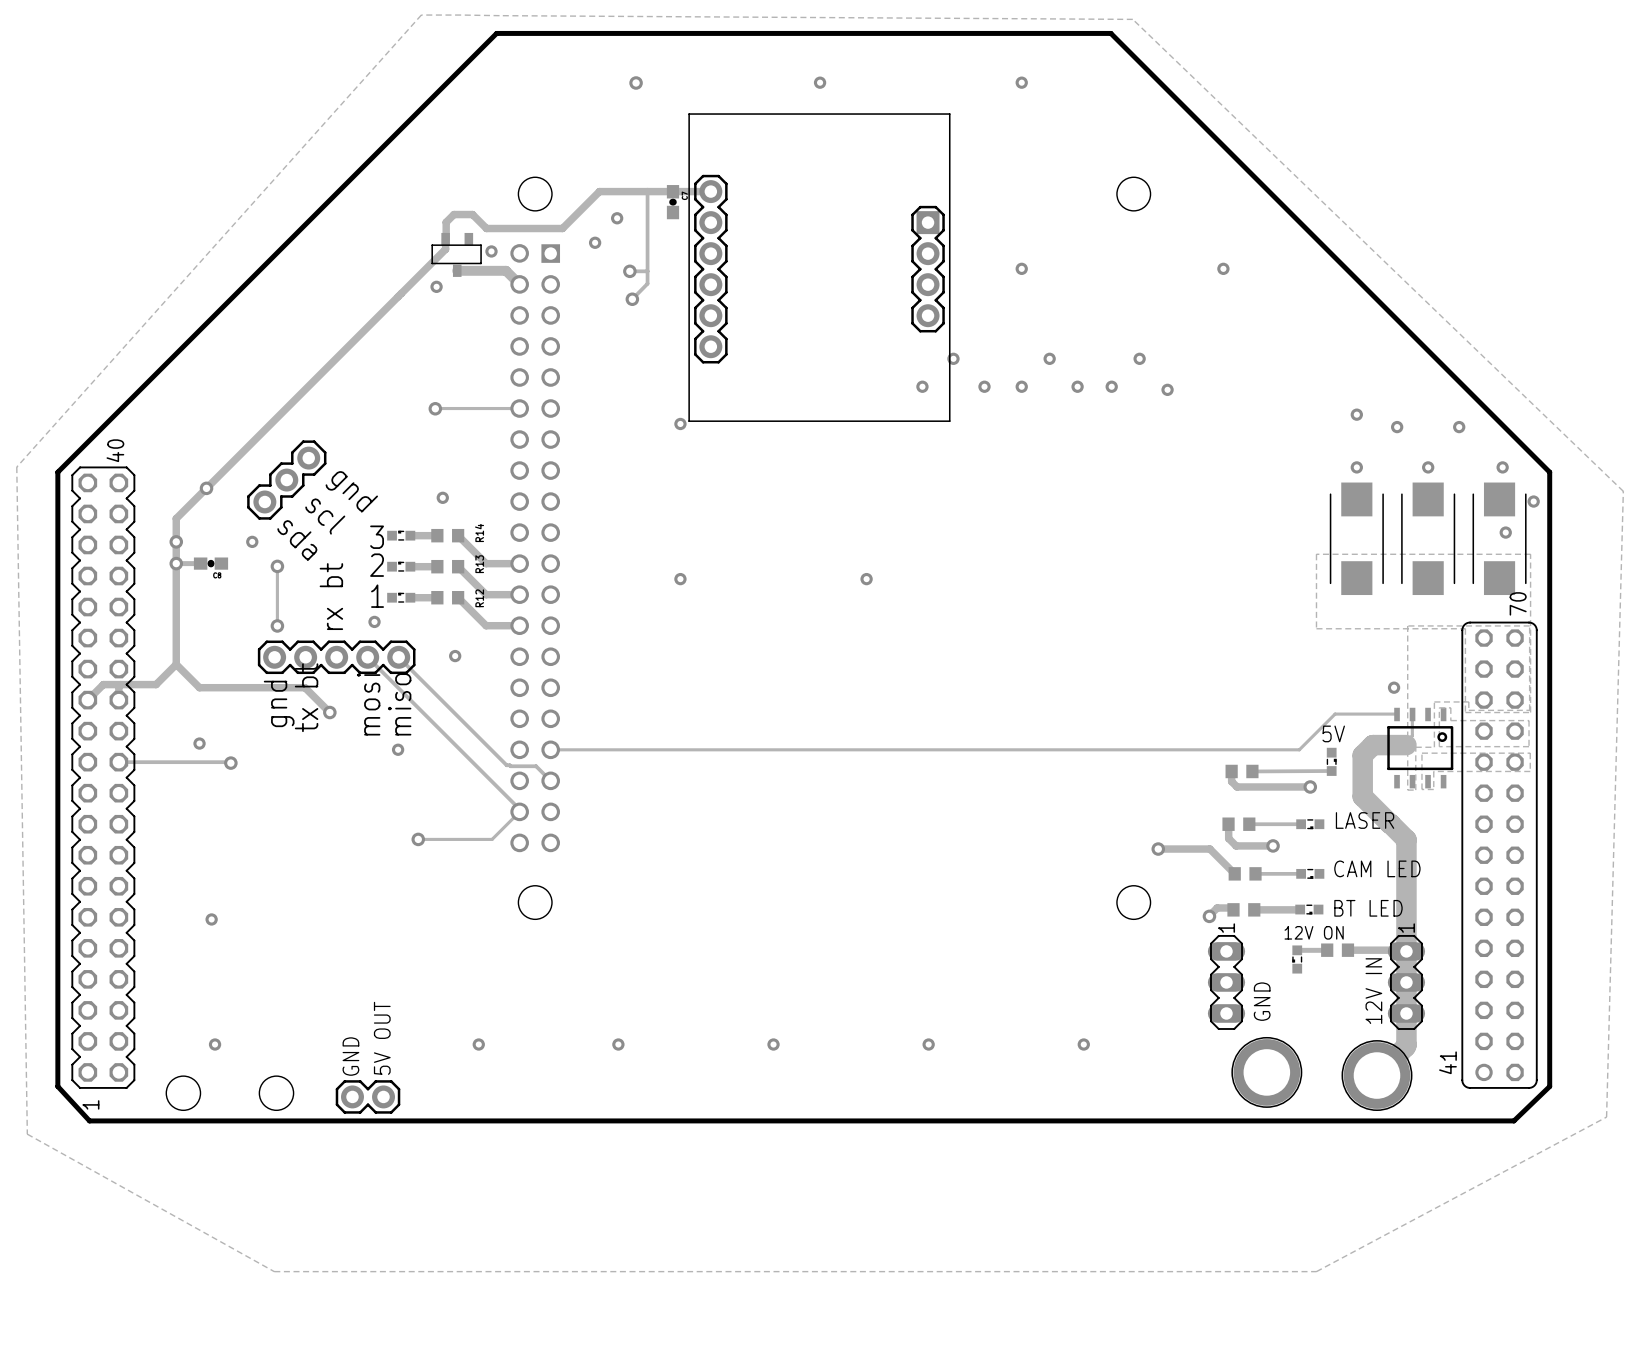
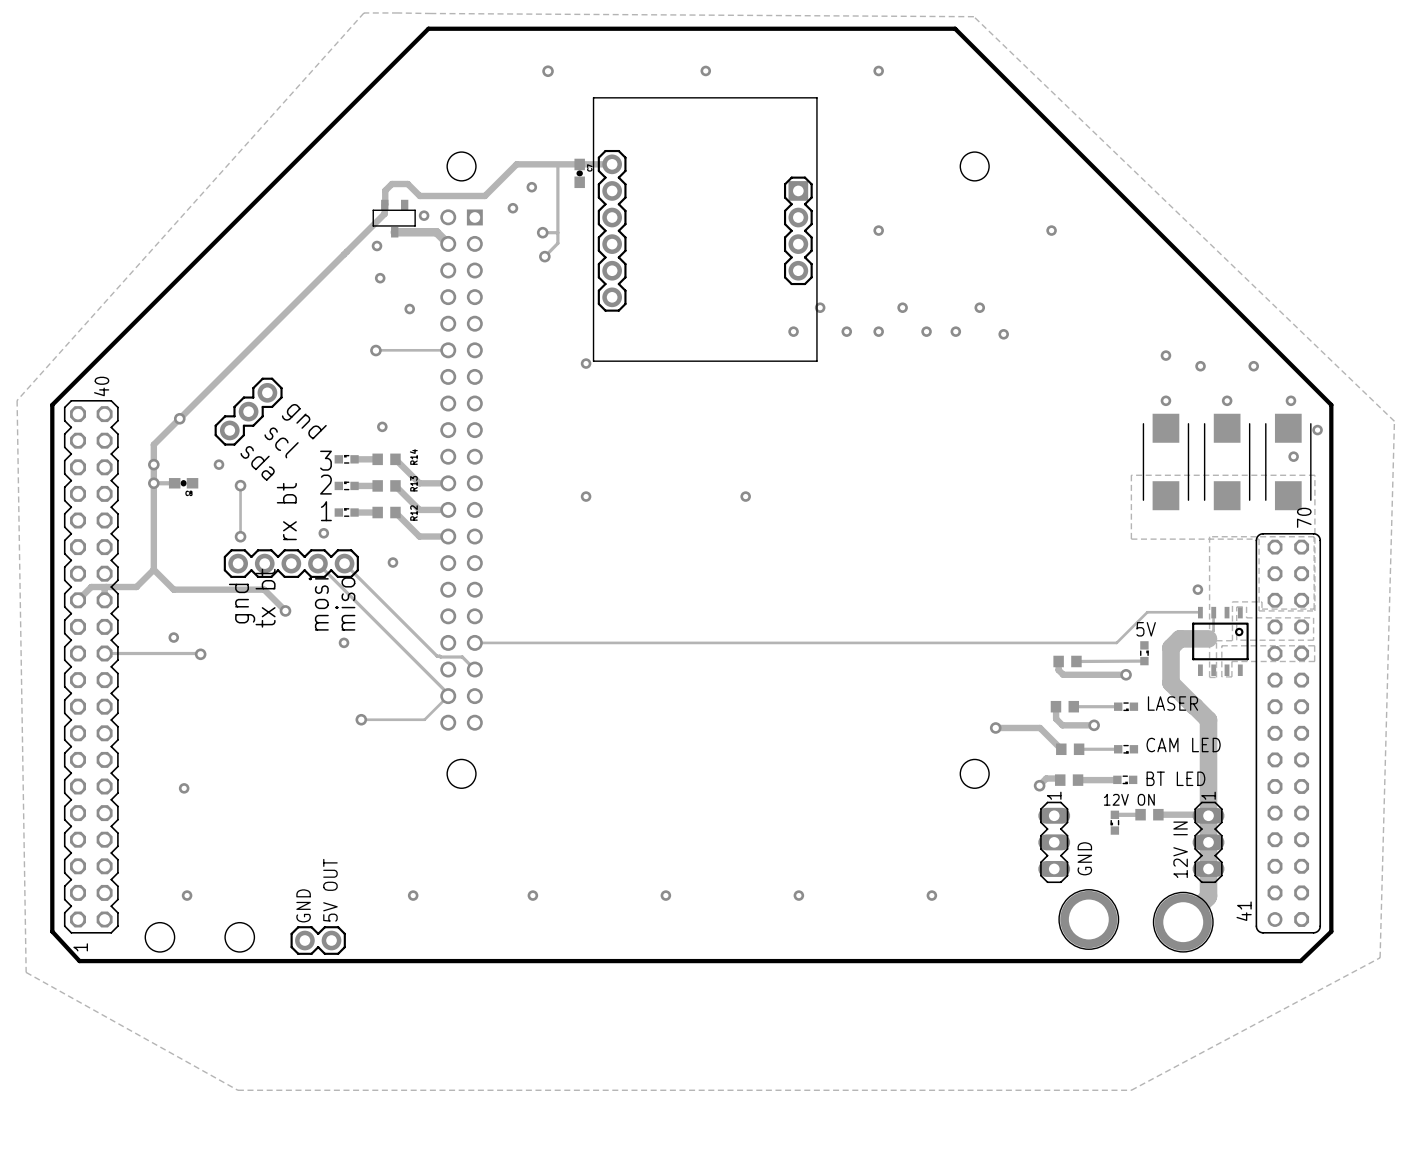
via: none -> (380, 278)
via: none -> (409, 309)

